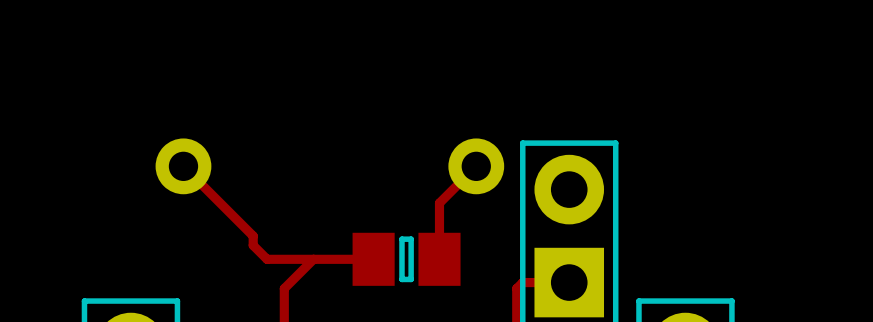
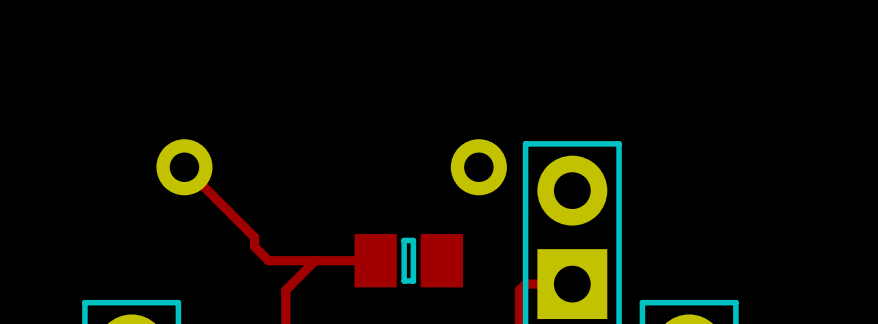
track: (476, 166) (439, 203) (439, 259) -> none

